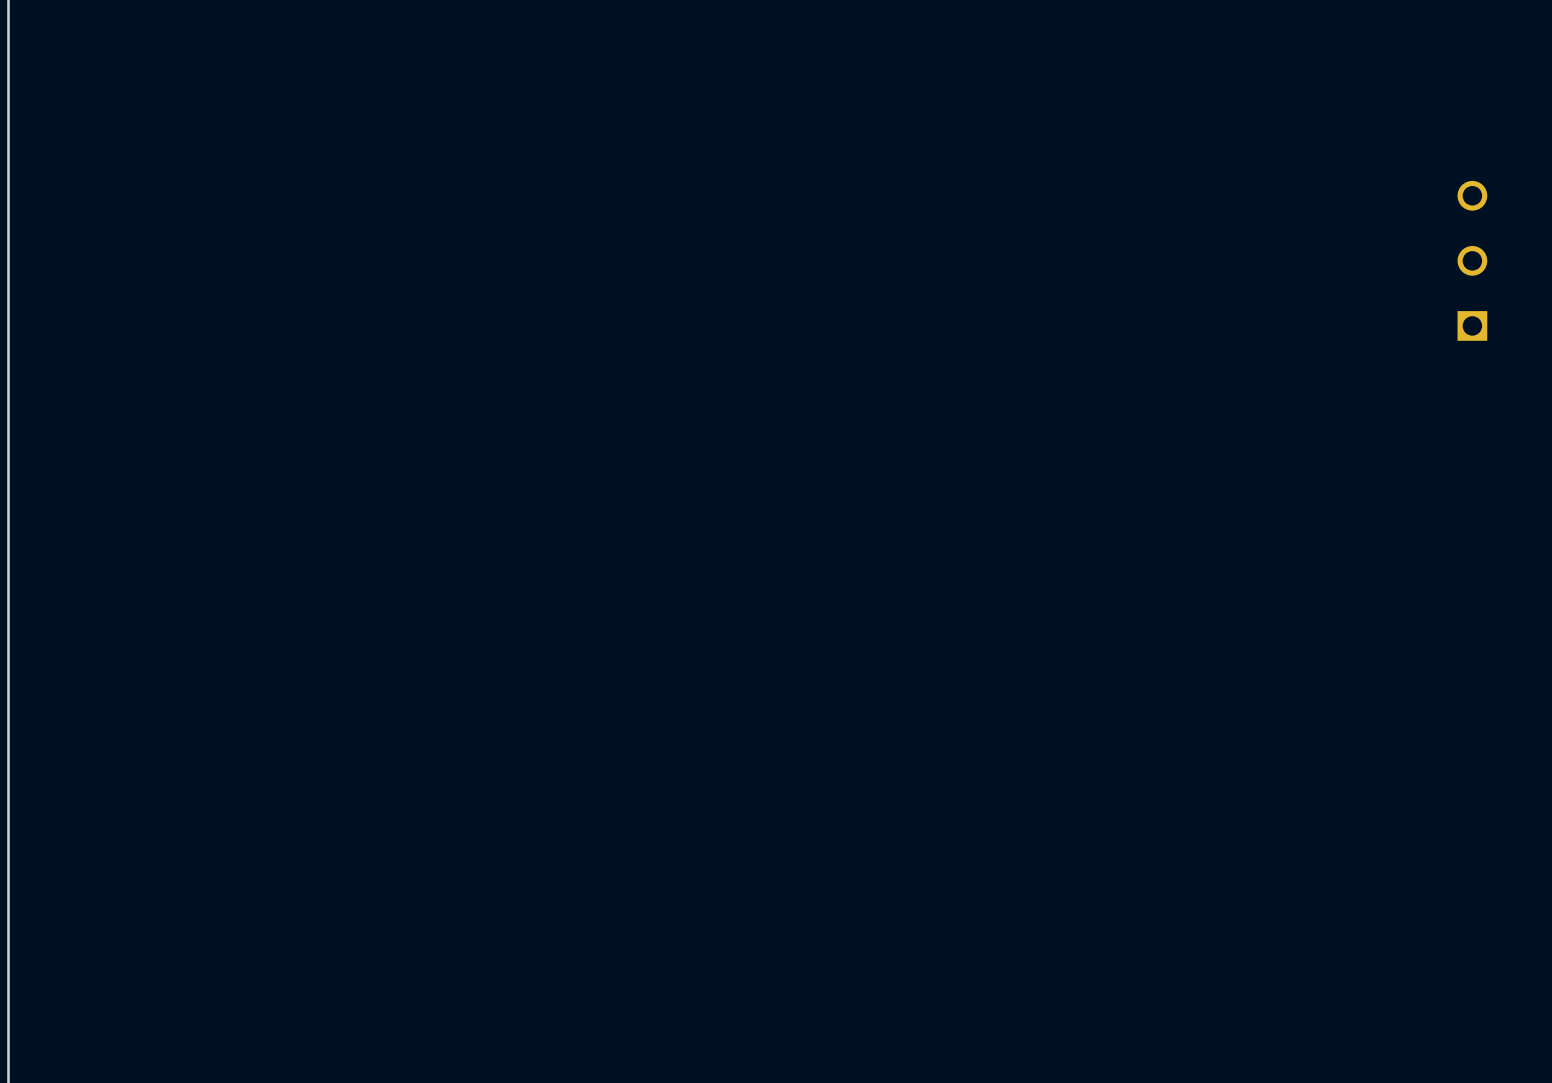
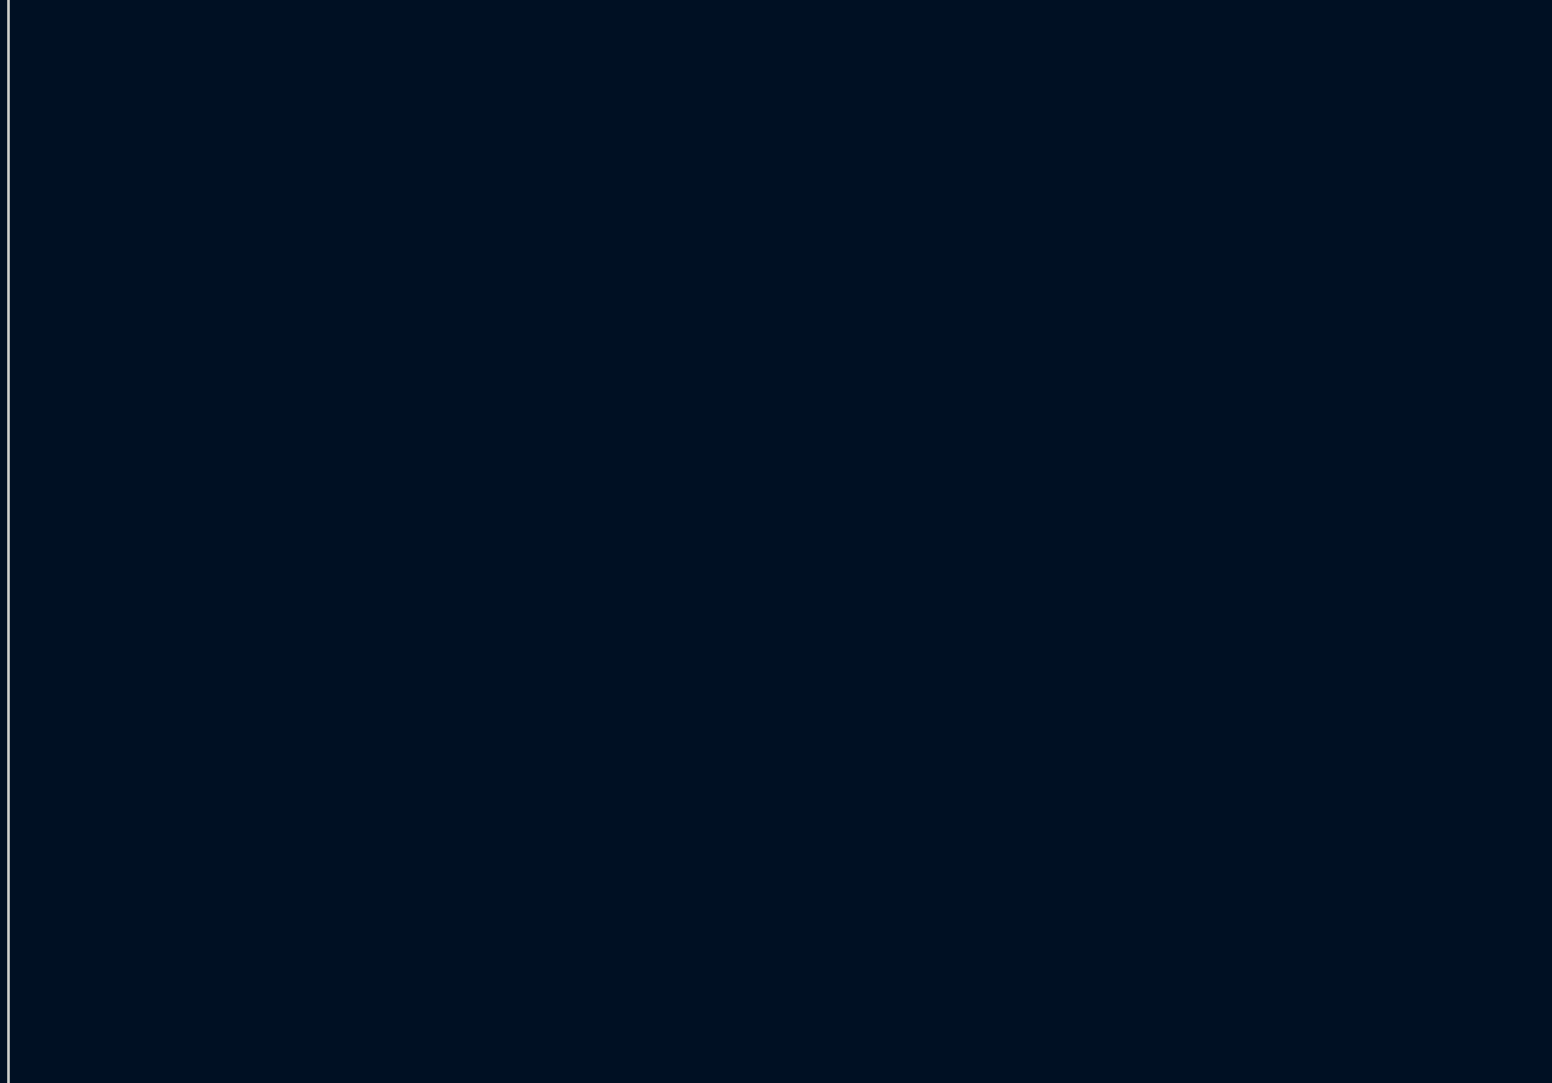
part: (1472, 260) -> none

